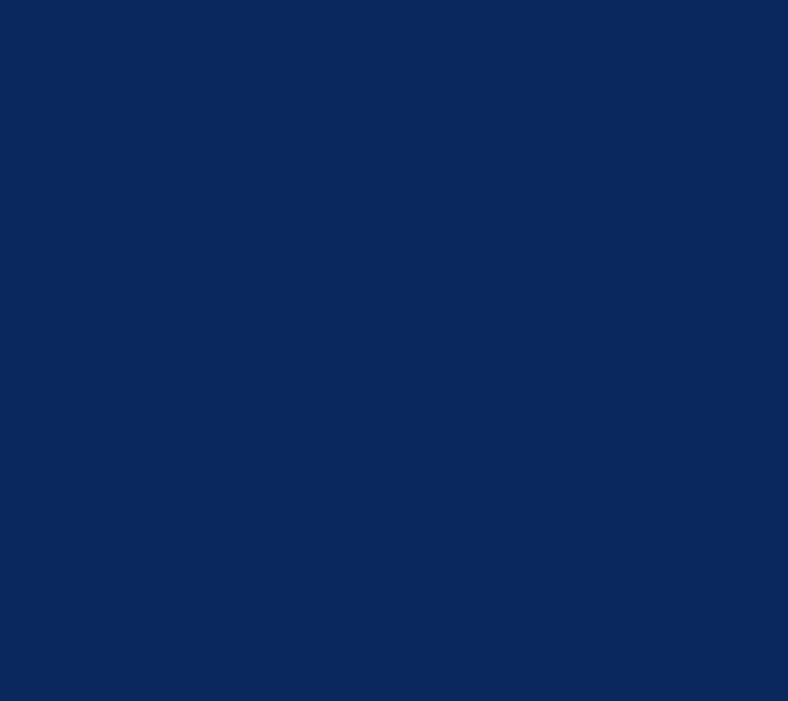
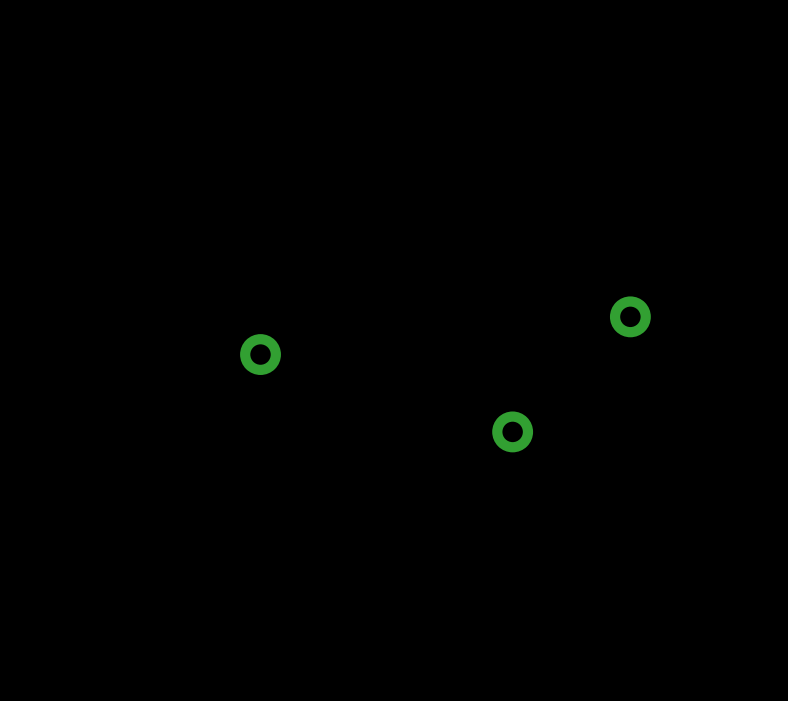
via: none -> (630, 316)
via: none -> (260, 354)
via: none -> (512, 431)

